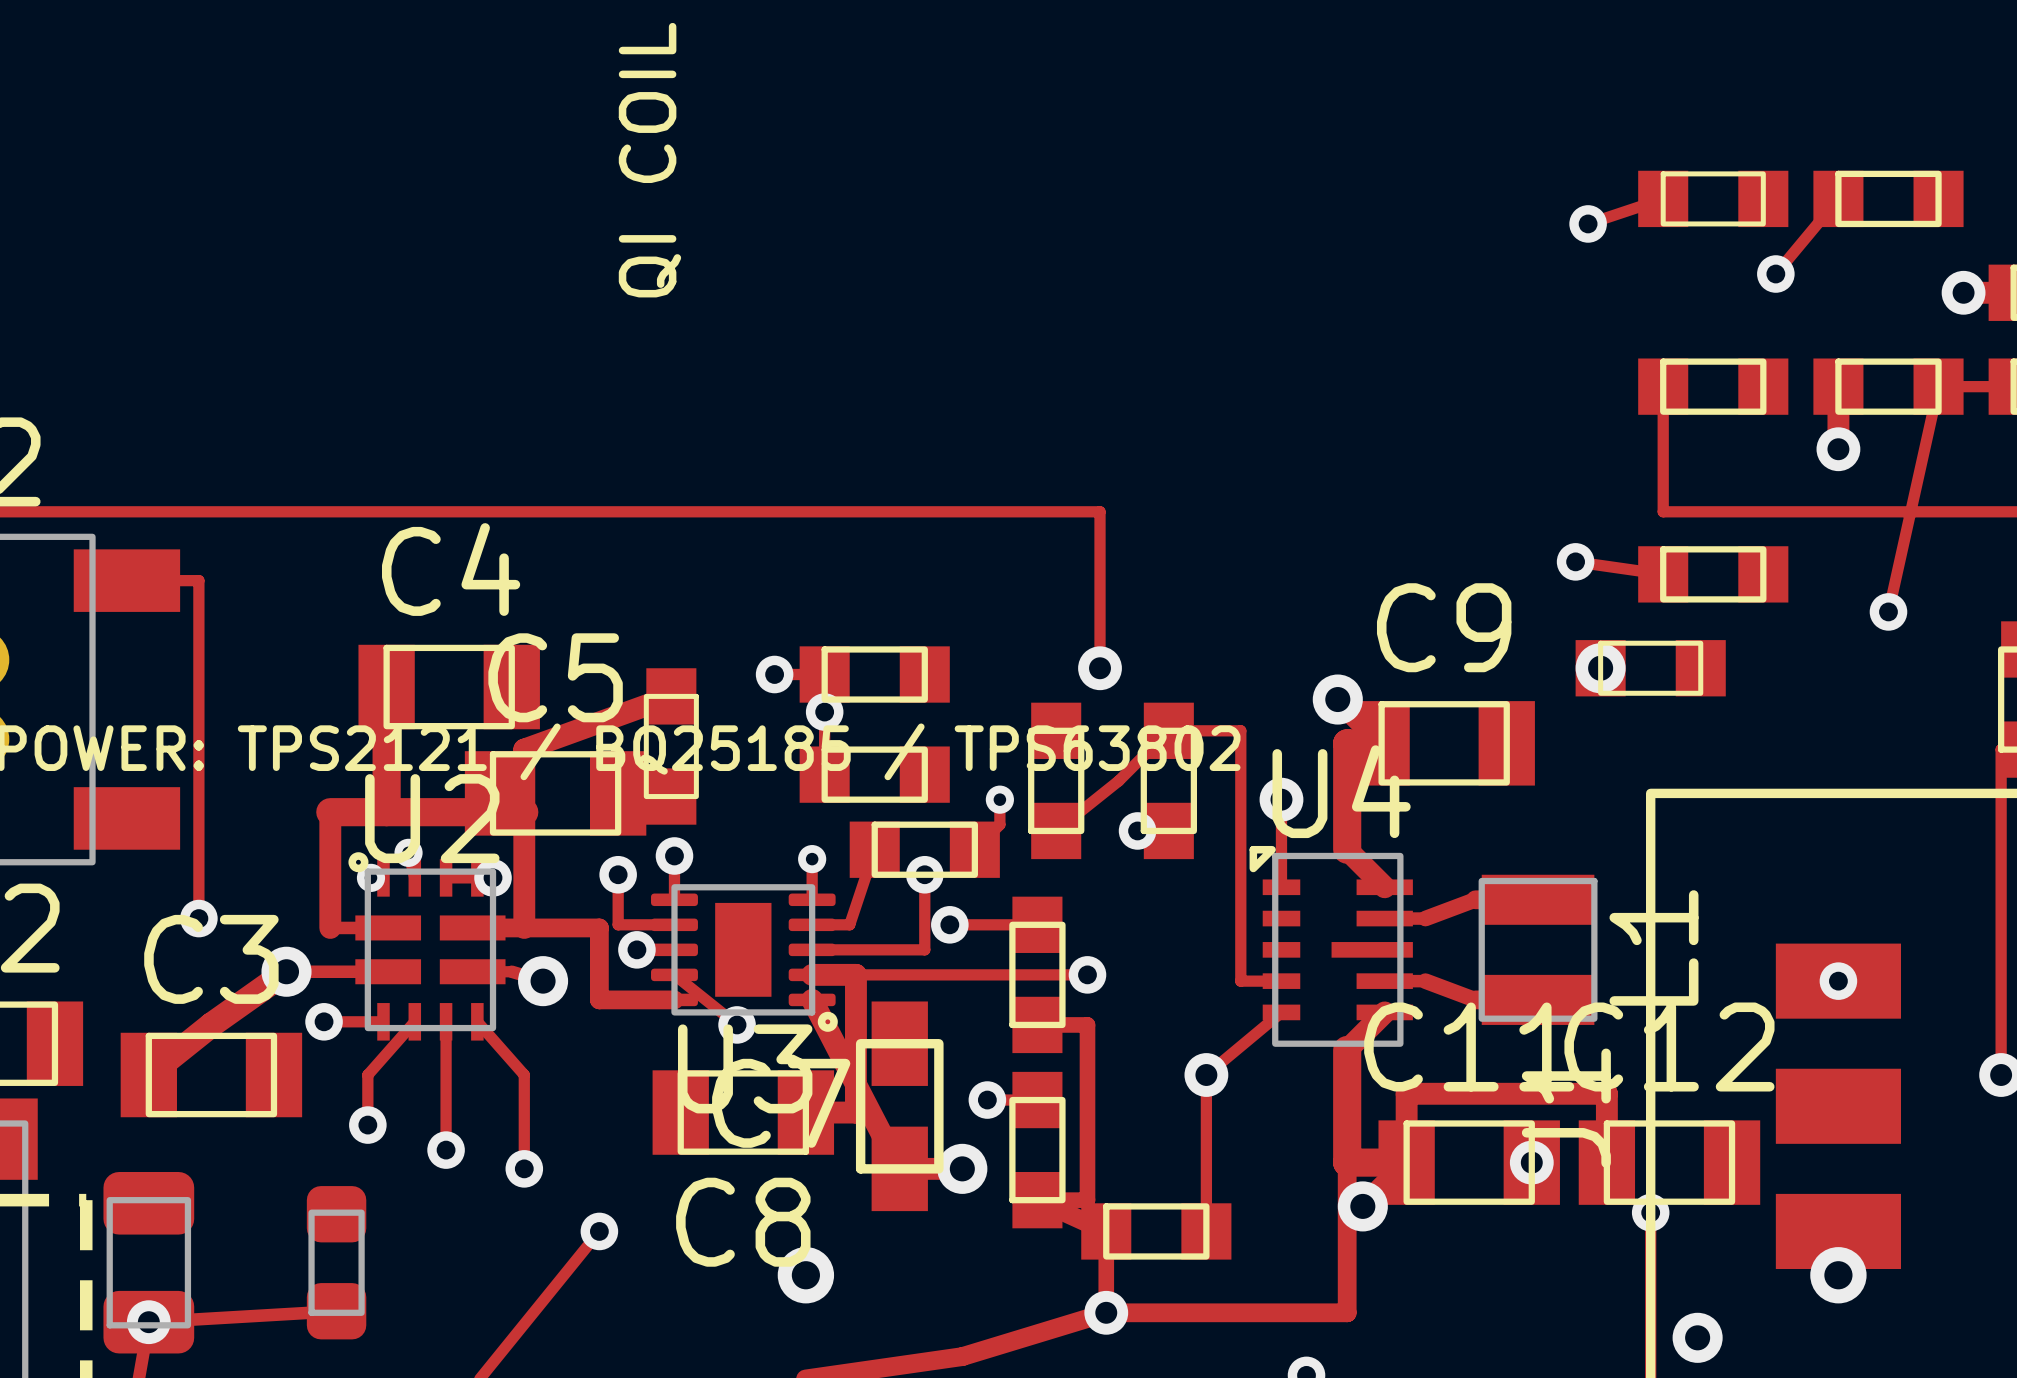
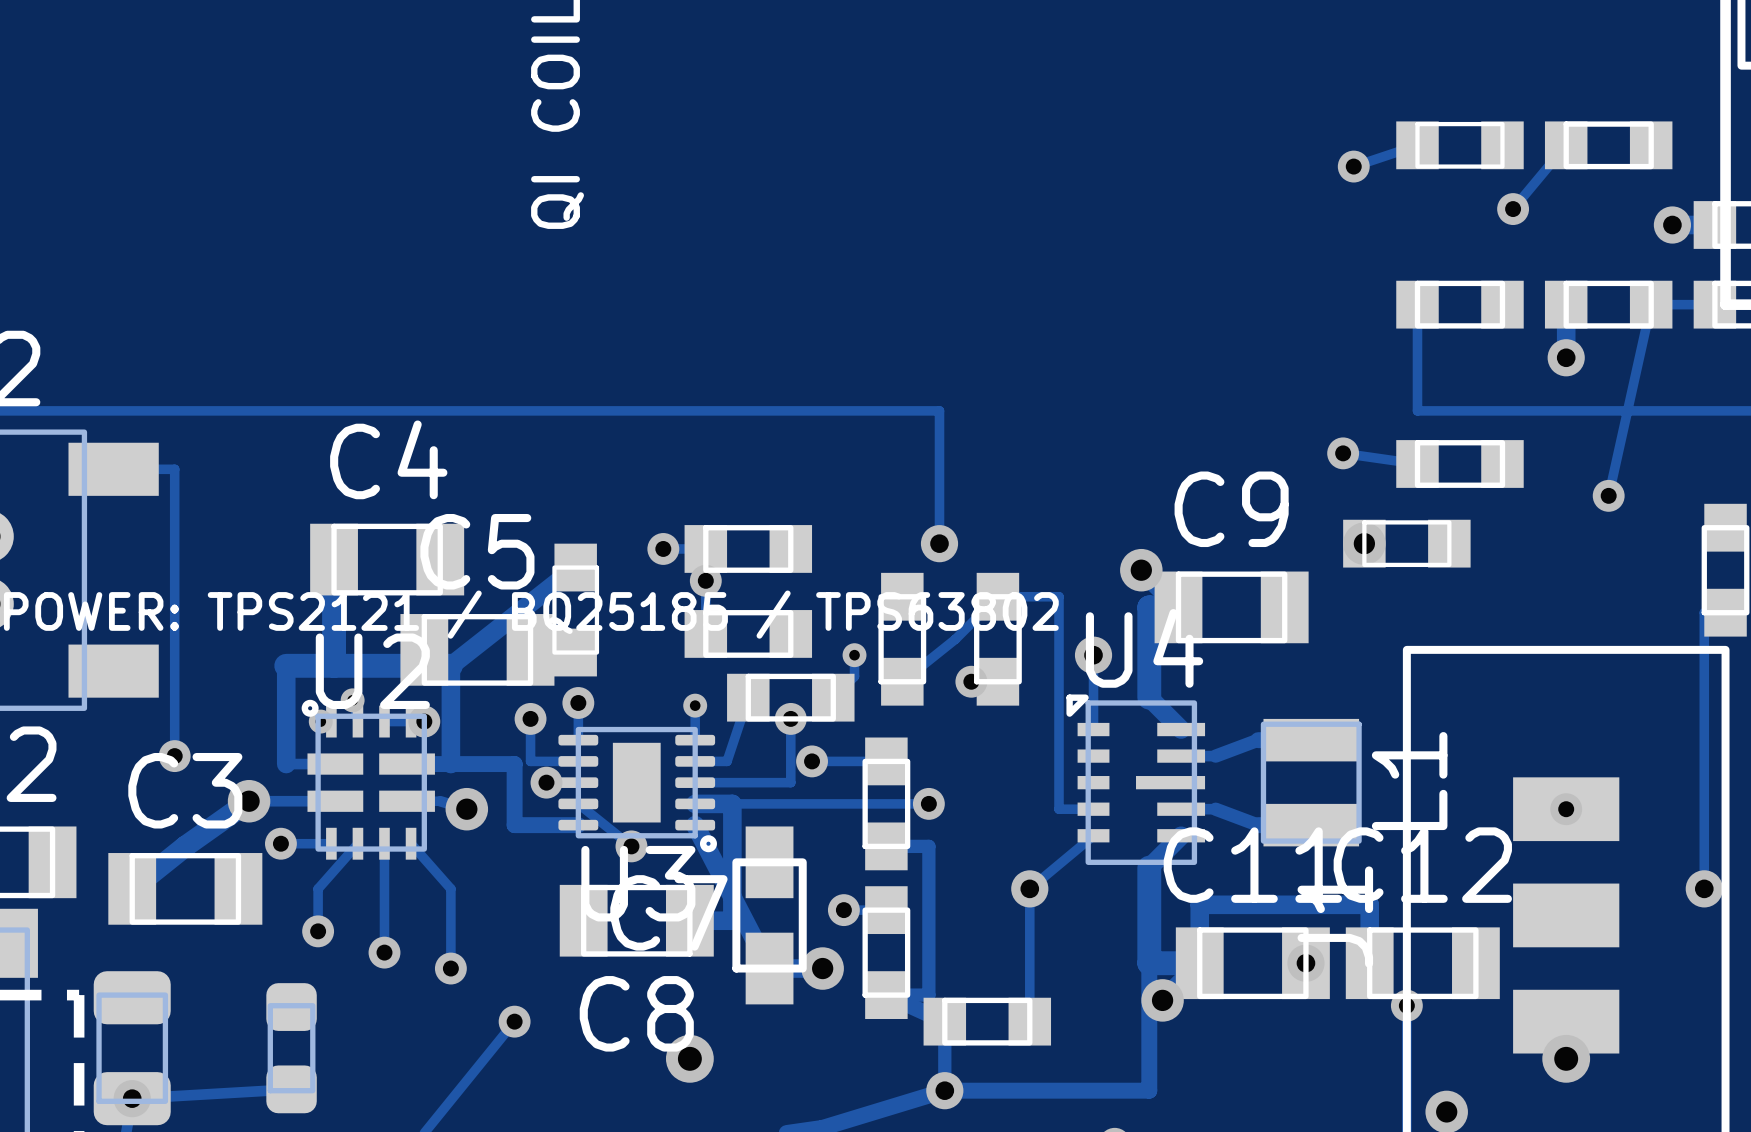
track: (671, 696) (524, 749) (524, 812) -> (575, 567) (450, 665)

